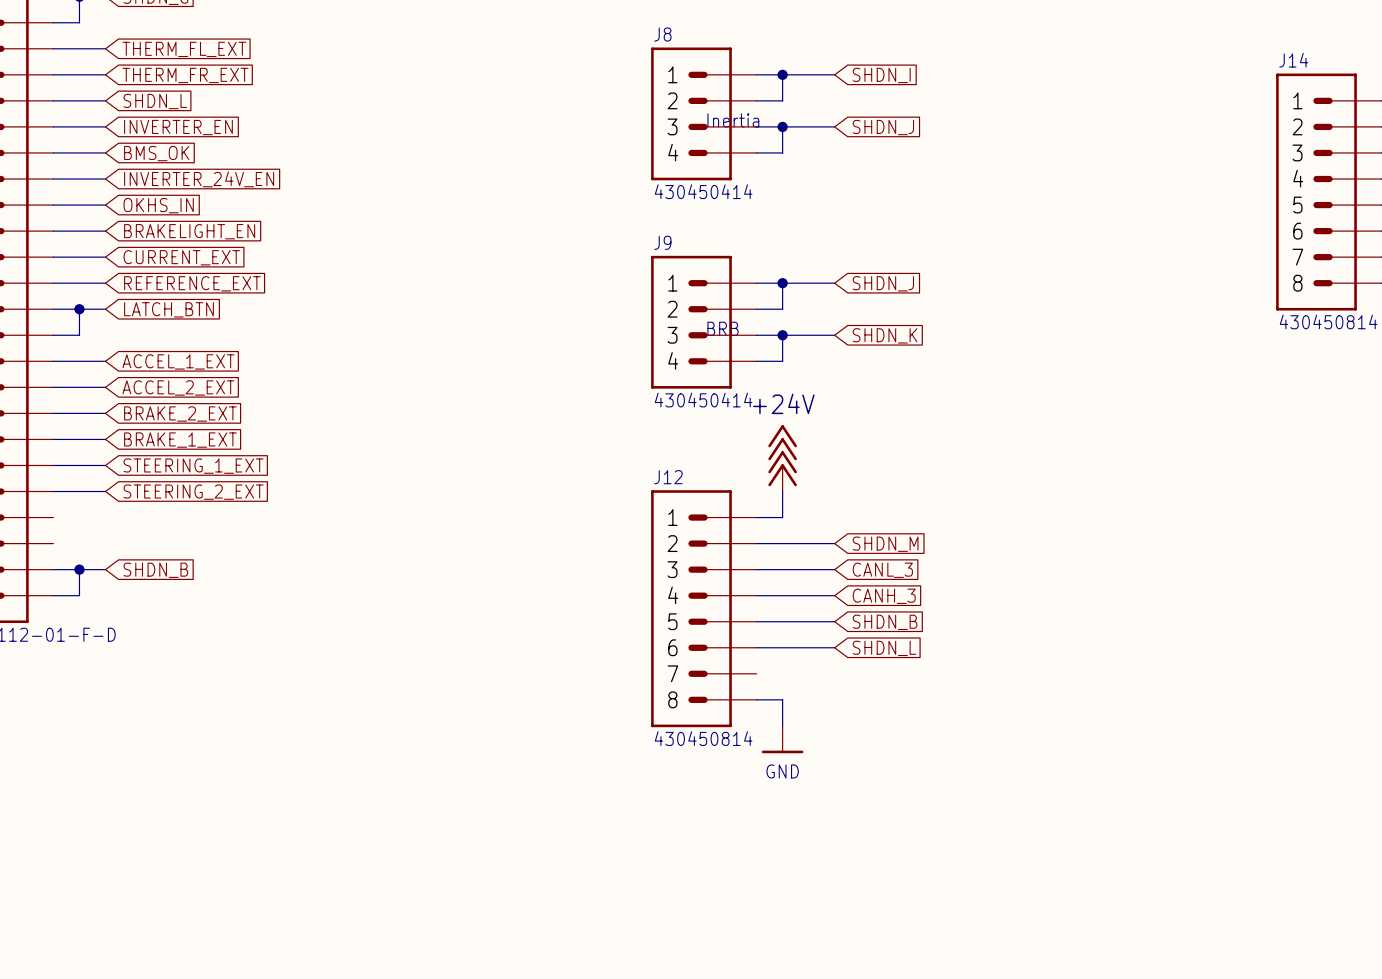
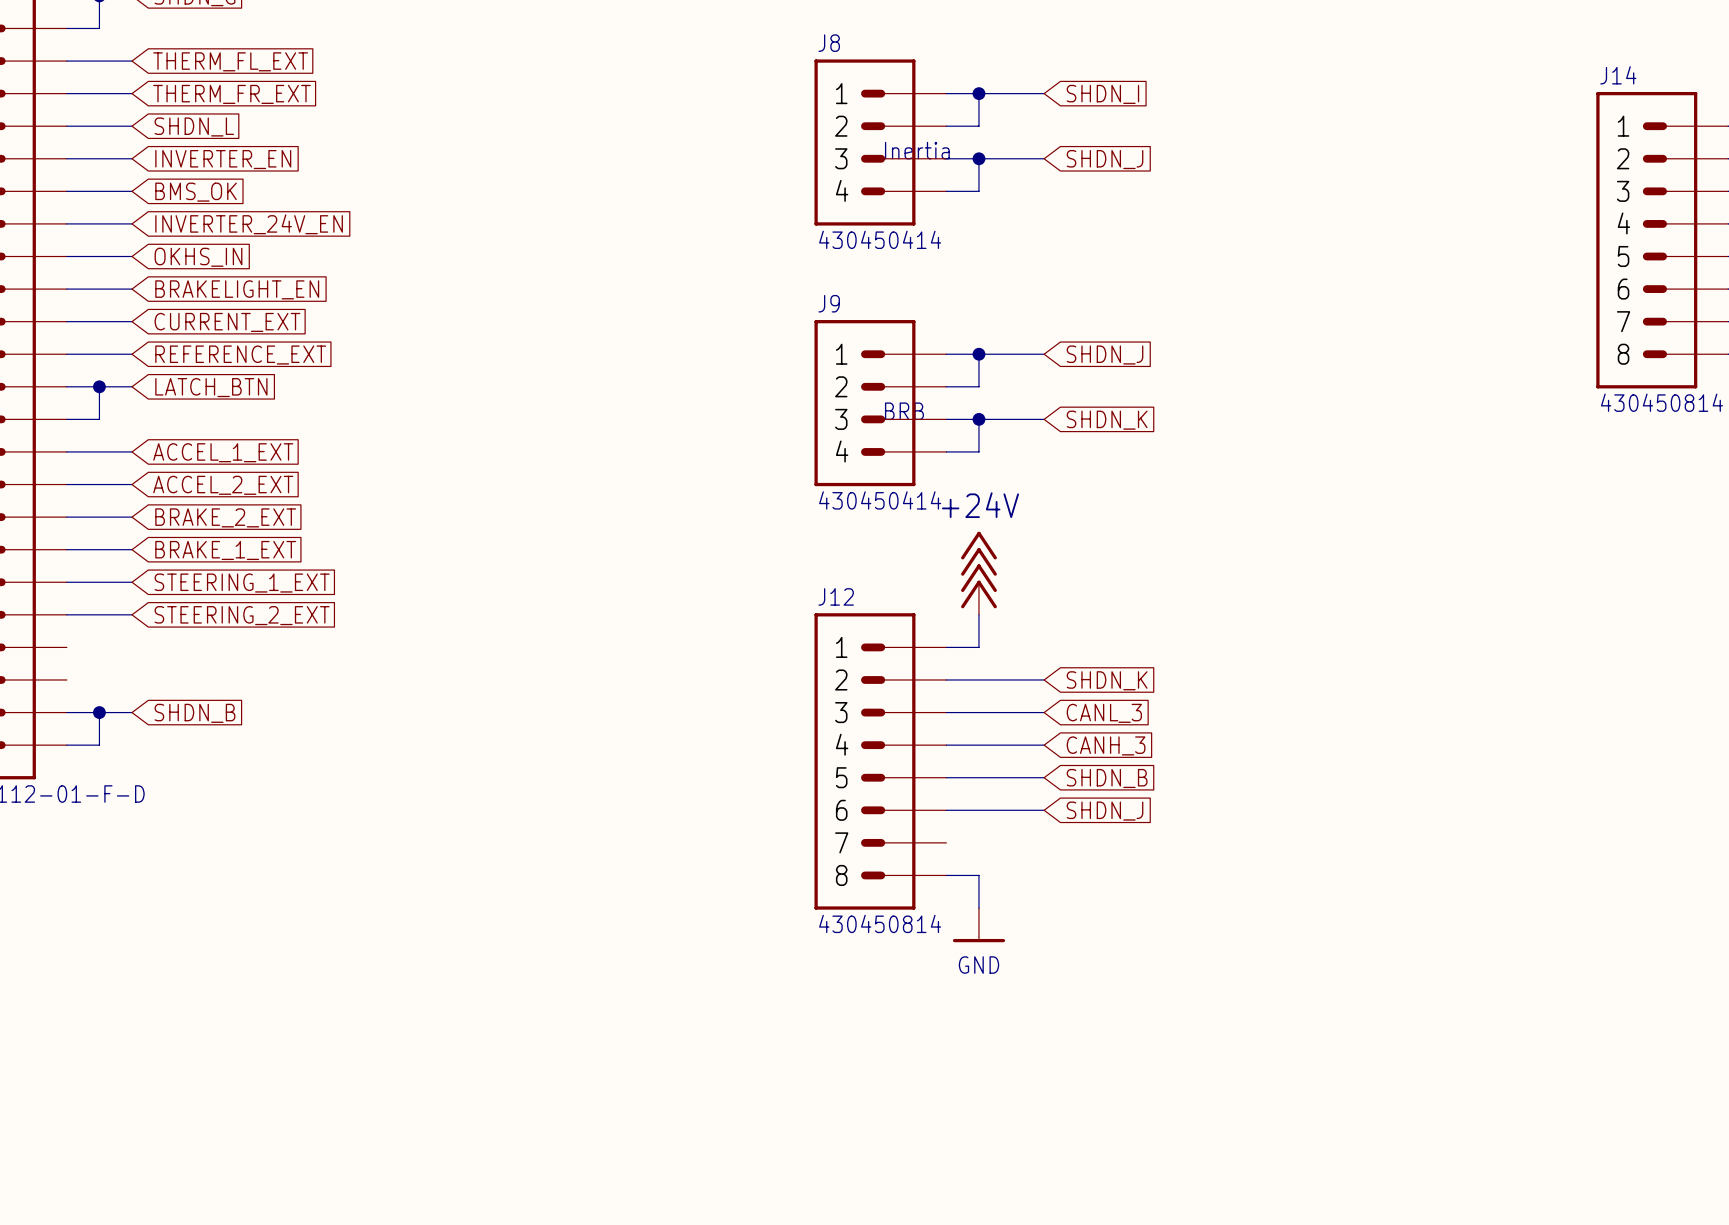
global label: SHDN_M (885, 544) -> SHDN_K (1107, 680)
global label: SHDN_L (884, 648) -> SHDN_J (1105, 811)

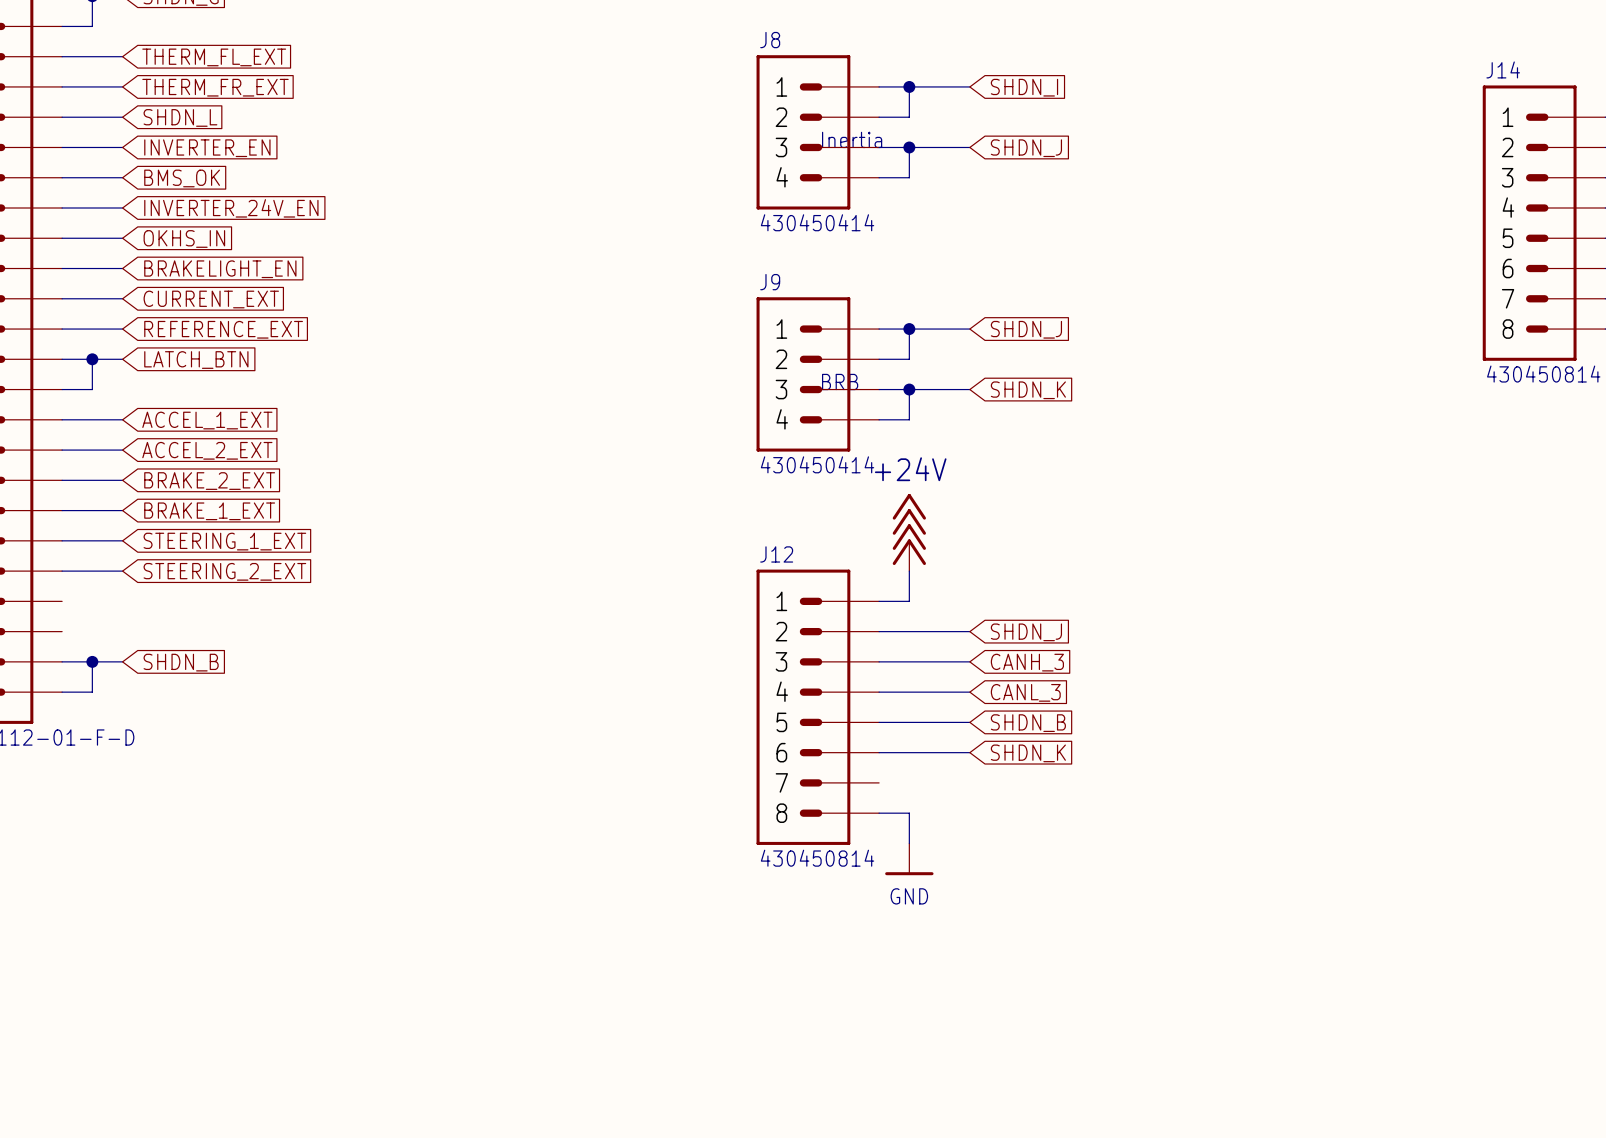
global label: SHDN_K (1107, 680) -> SHDN_J (1026, 632)
global label: CANL_3 (1104, 713) -> CANH_3 (1027, 662)
global label: CANH_3 (1106, 745) -> CANL_3 (1025, 692)
global label: SHDN_J (1105, 811) -> SHDN_K (1028, 753)

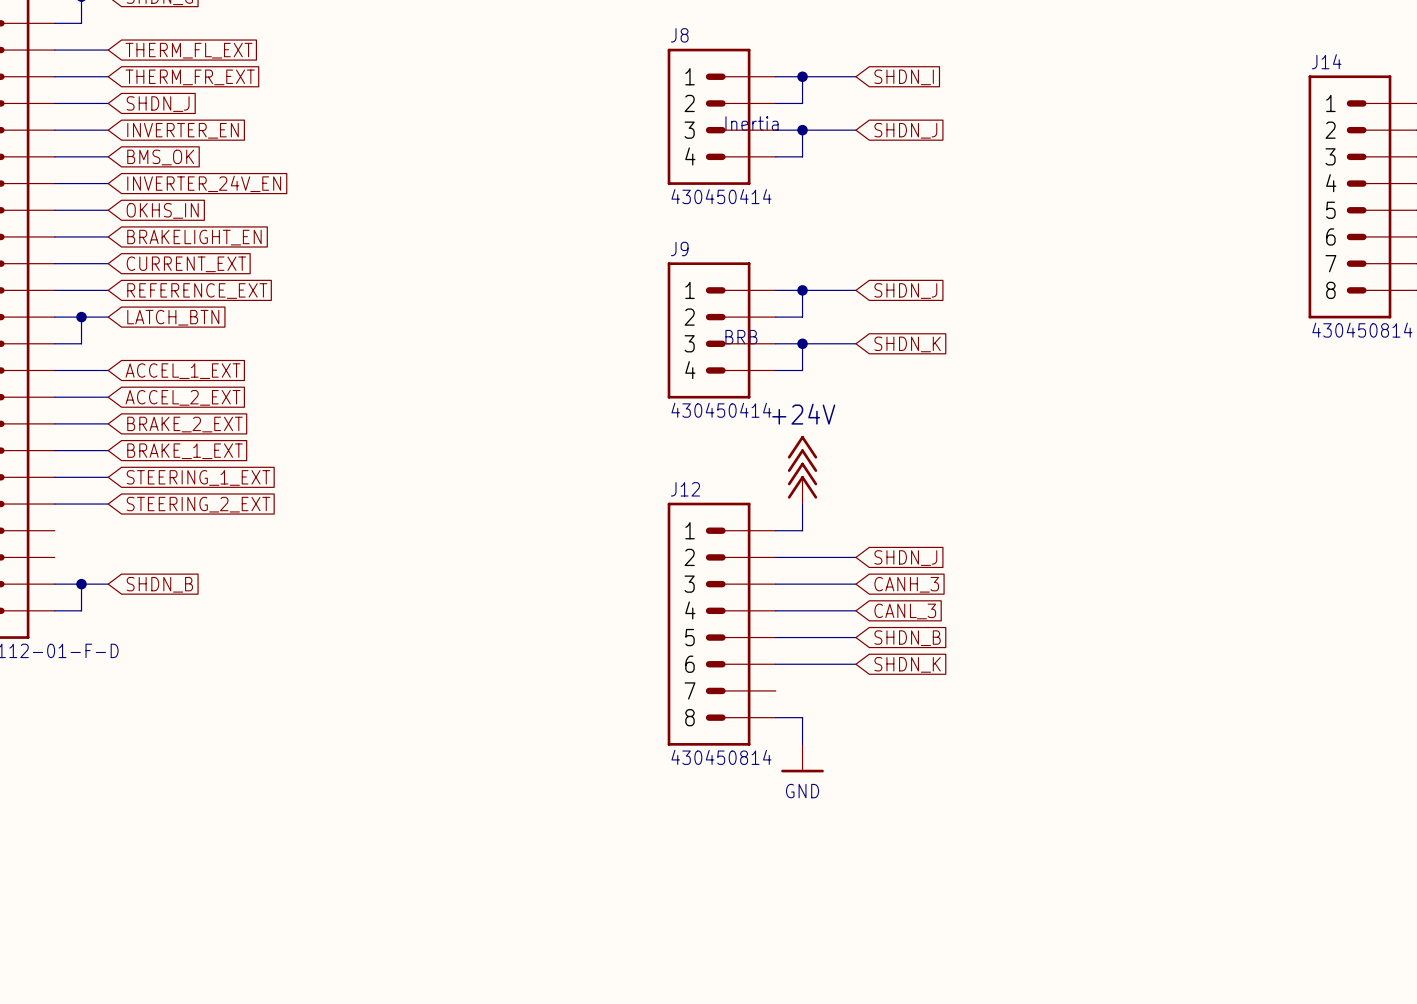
global label: SHDN_L (180, 117) -> SHDN_J (158, 104)

